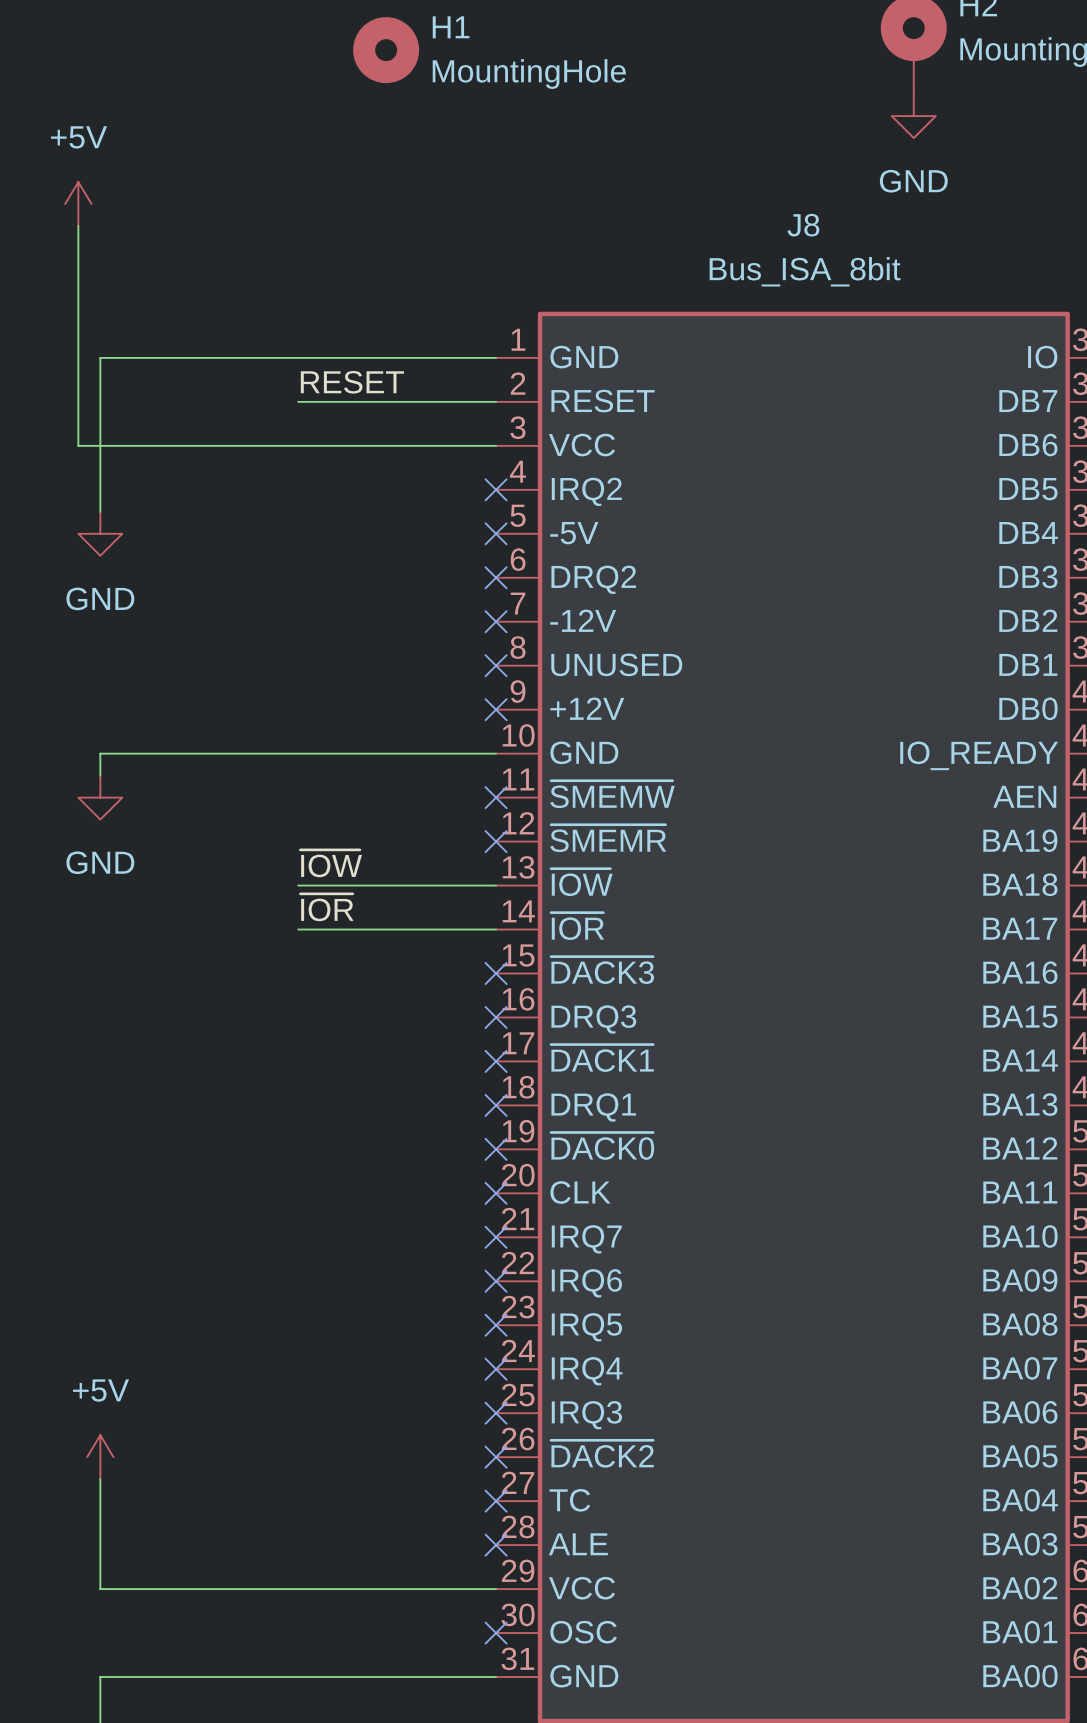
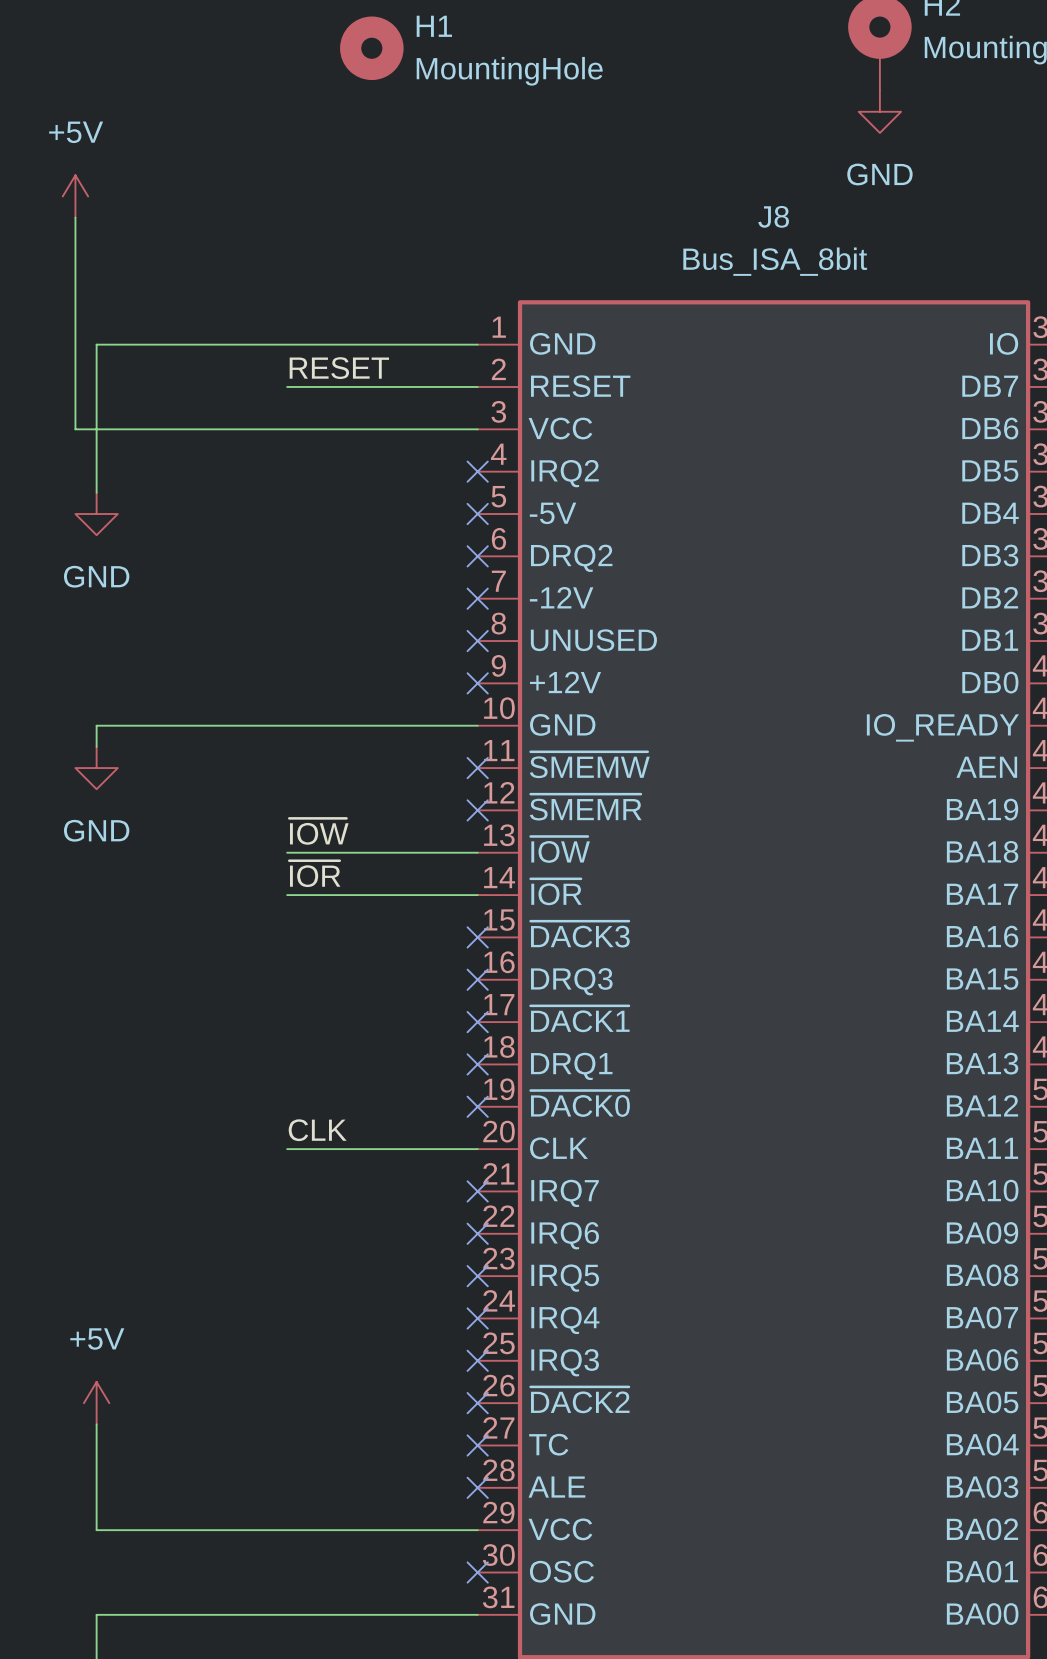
label: none -> CLK (317, 1130)
wire: none -> (287, 1149) (477, 1149)
no-connect mark: (496, 1193) -> none

